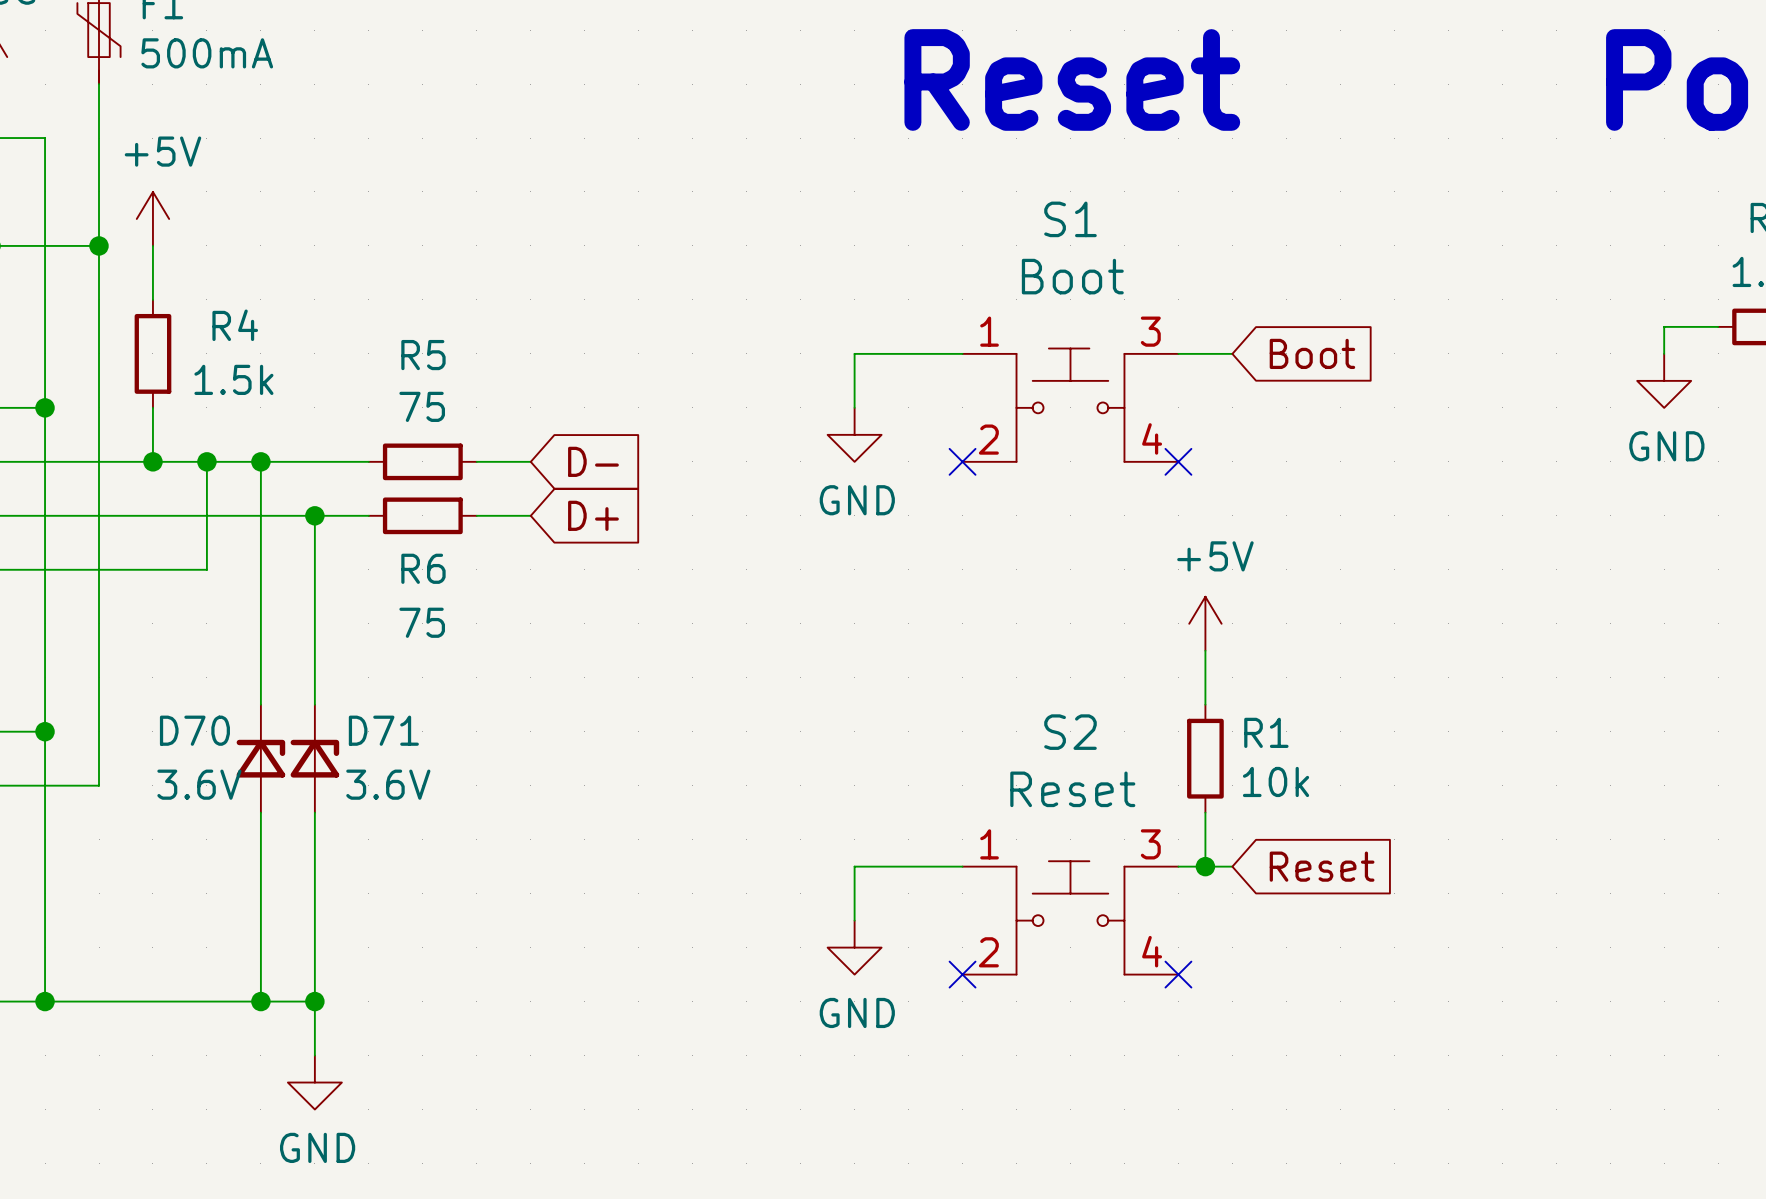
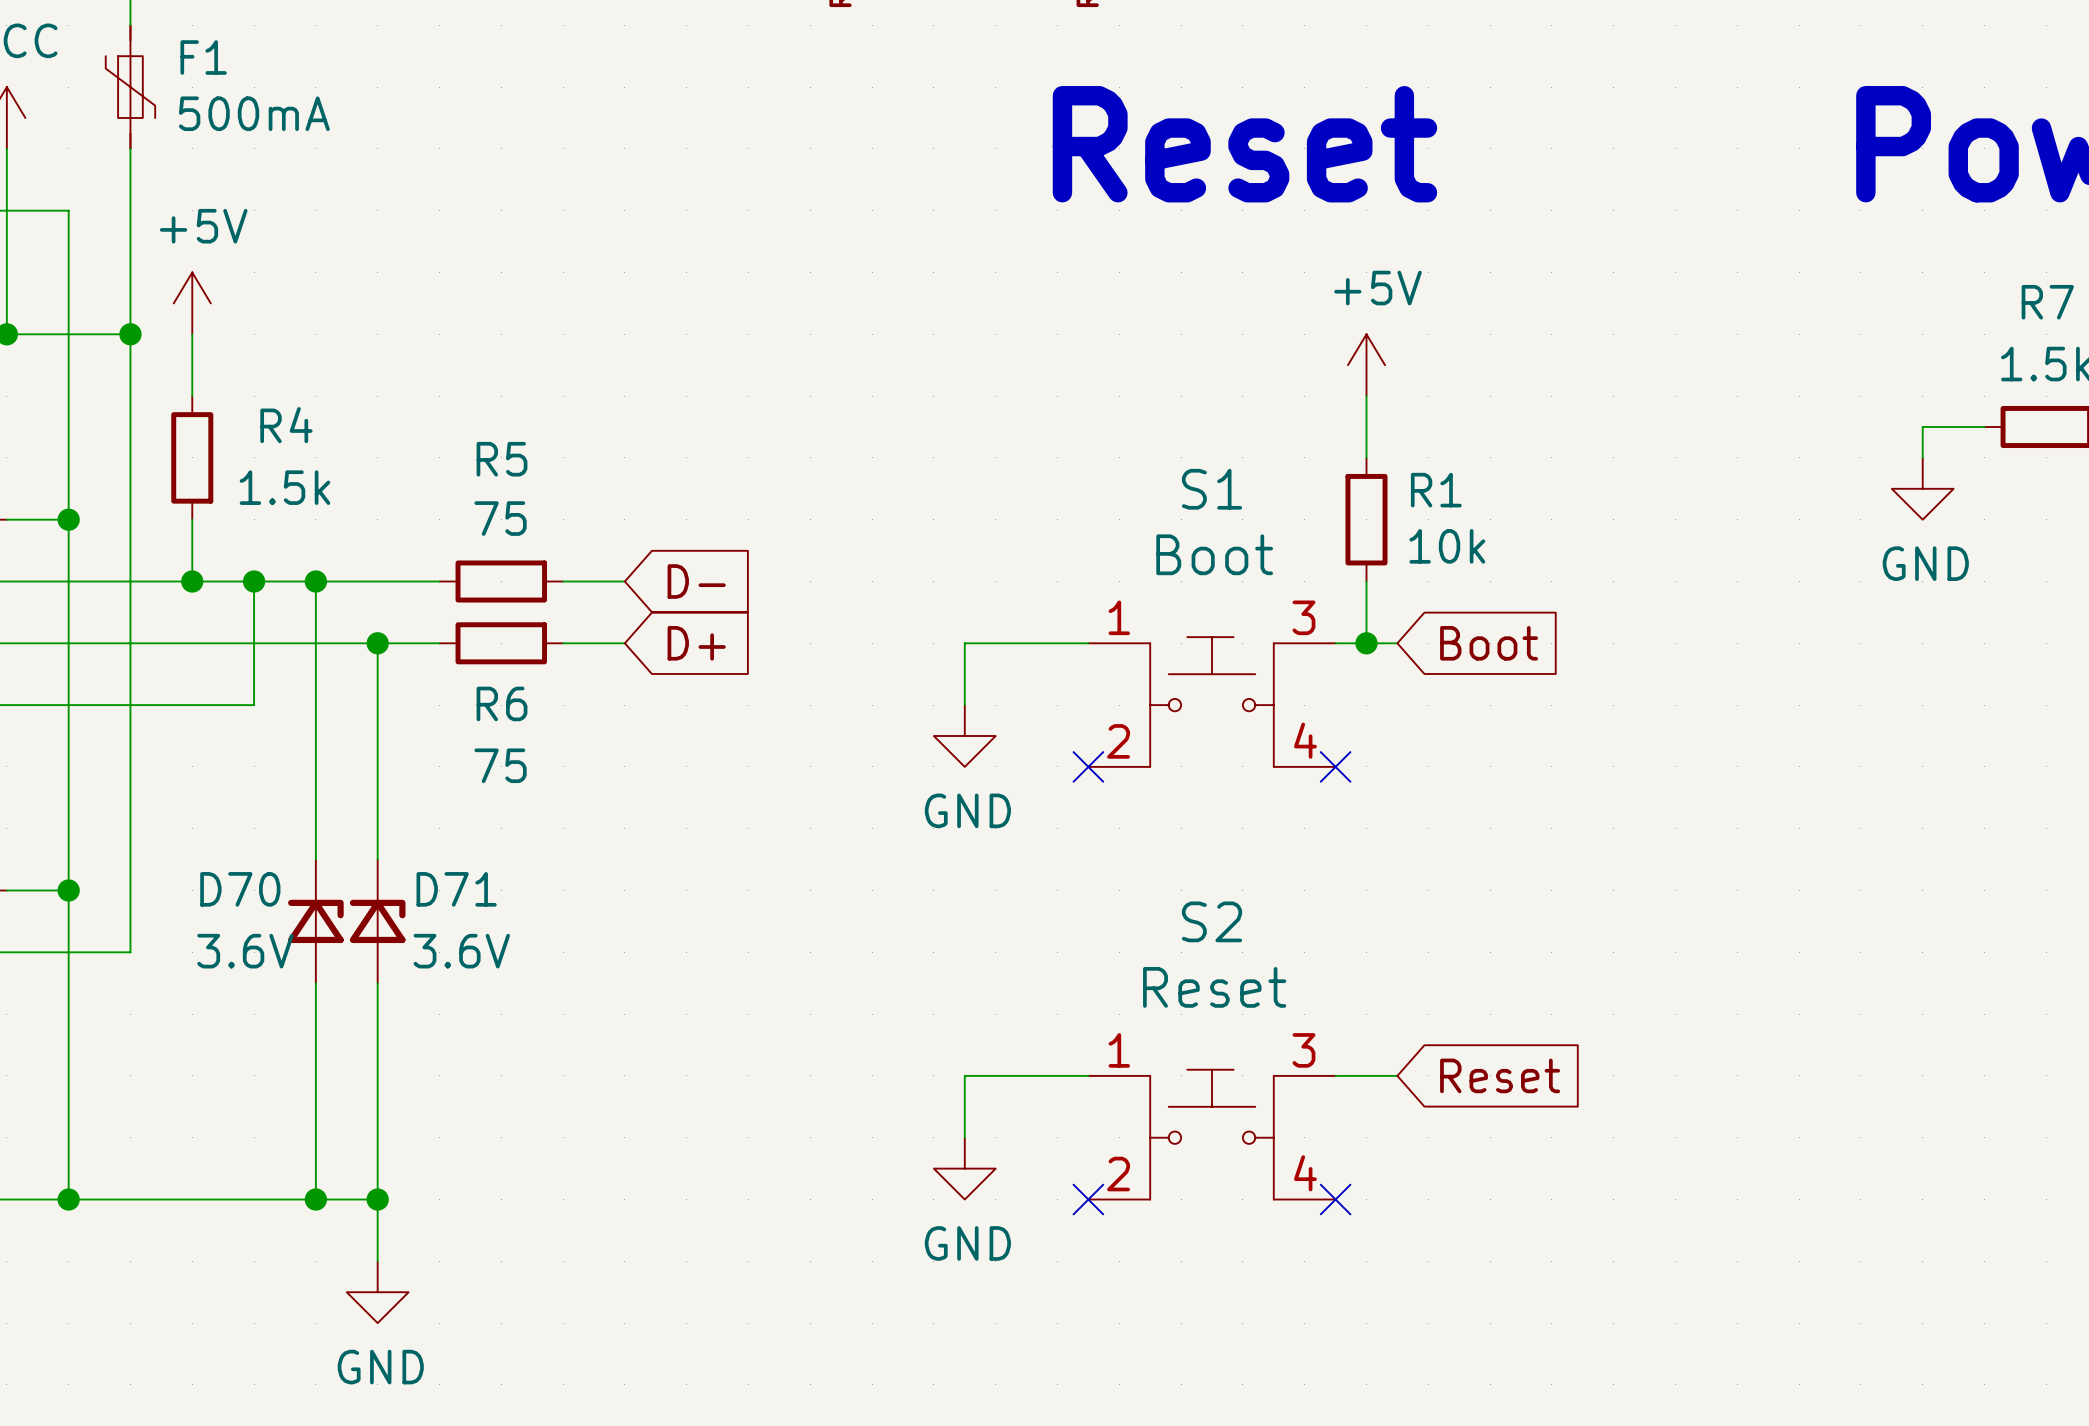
wire: (962, 353) (854, 353) (854, 407) -> none
wire: (1178, 353) (1232, 353) -> (1366, 457) (1366, 396)
global label position: Boot (1312, 353) -> Boot (1489, 643)
S1 position: (1070, 405) -> (1211, 702)
power symbol position: GND (854, 434) -> GND (964, 736)
no-connect mark: (962, 461) -> none
no-connect mark: (1178, 461) -> none
junction: none -> (1366, 643)
no-connect mark: none -> (1088, 766)
no-connect mark: none -> (1335, 766)
power symbol position: +5V (1205, 623) -> +5V (1366, 365)
wire: (1205, 650) (1205, 704) -> none
R1 position: (1205, 758) -> (1366, 519)
wire: (1205, 812) (1205, 866) -> (1366, 581) (1366, 643)
wire: (962, 866) (854, 866) (854, 920) -> (1088, 643) (964, 643) (964, 705)
wire: (1178, 866) (1232, 866) -> (1335, 643) (1397, 643)
junction: (1205, 866) -> none
global label position: Reset (1322, 866) -> Reset (1500, 1075)
wire: none -> (1088, 1075) (964, 1075) (964, 1137)
wire: none -> (1335, 1075) (1397, 1075)
S2 position: (1070, 917) -> (1211, 1134)
power symbol position: GND (854, 947) -> GND (964, 1168)
no-connect mark position: (962, 974) -> (1088, 1199)
no-connect mark position: (1178, 974) -> (1335, 1199)

